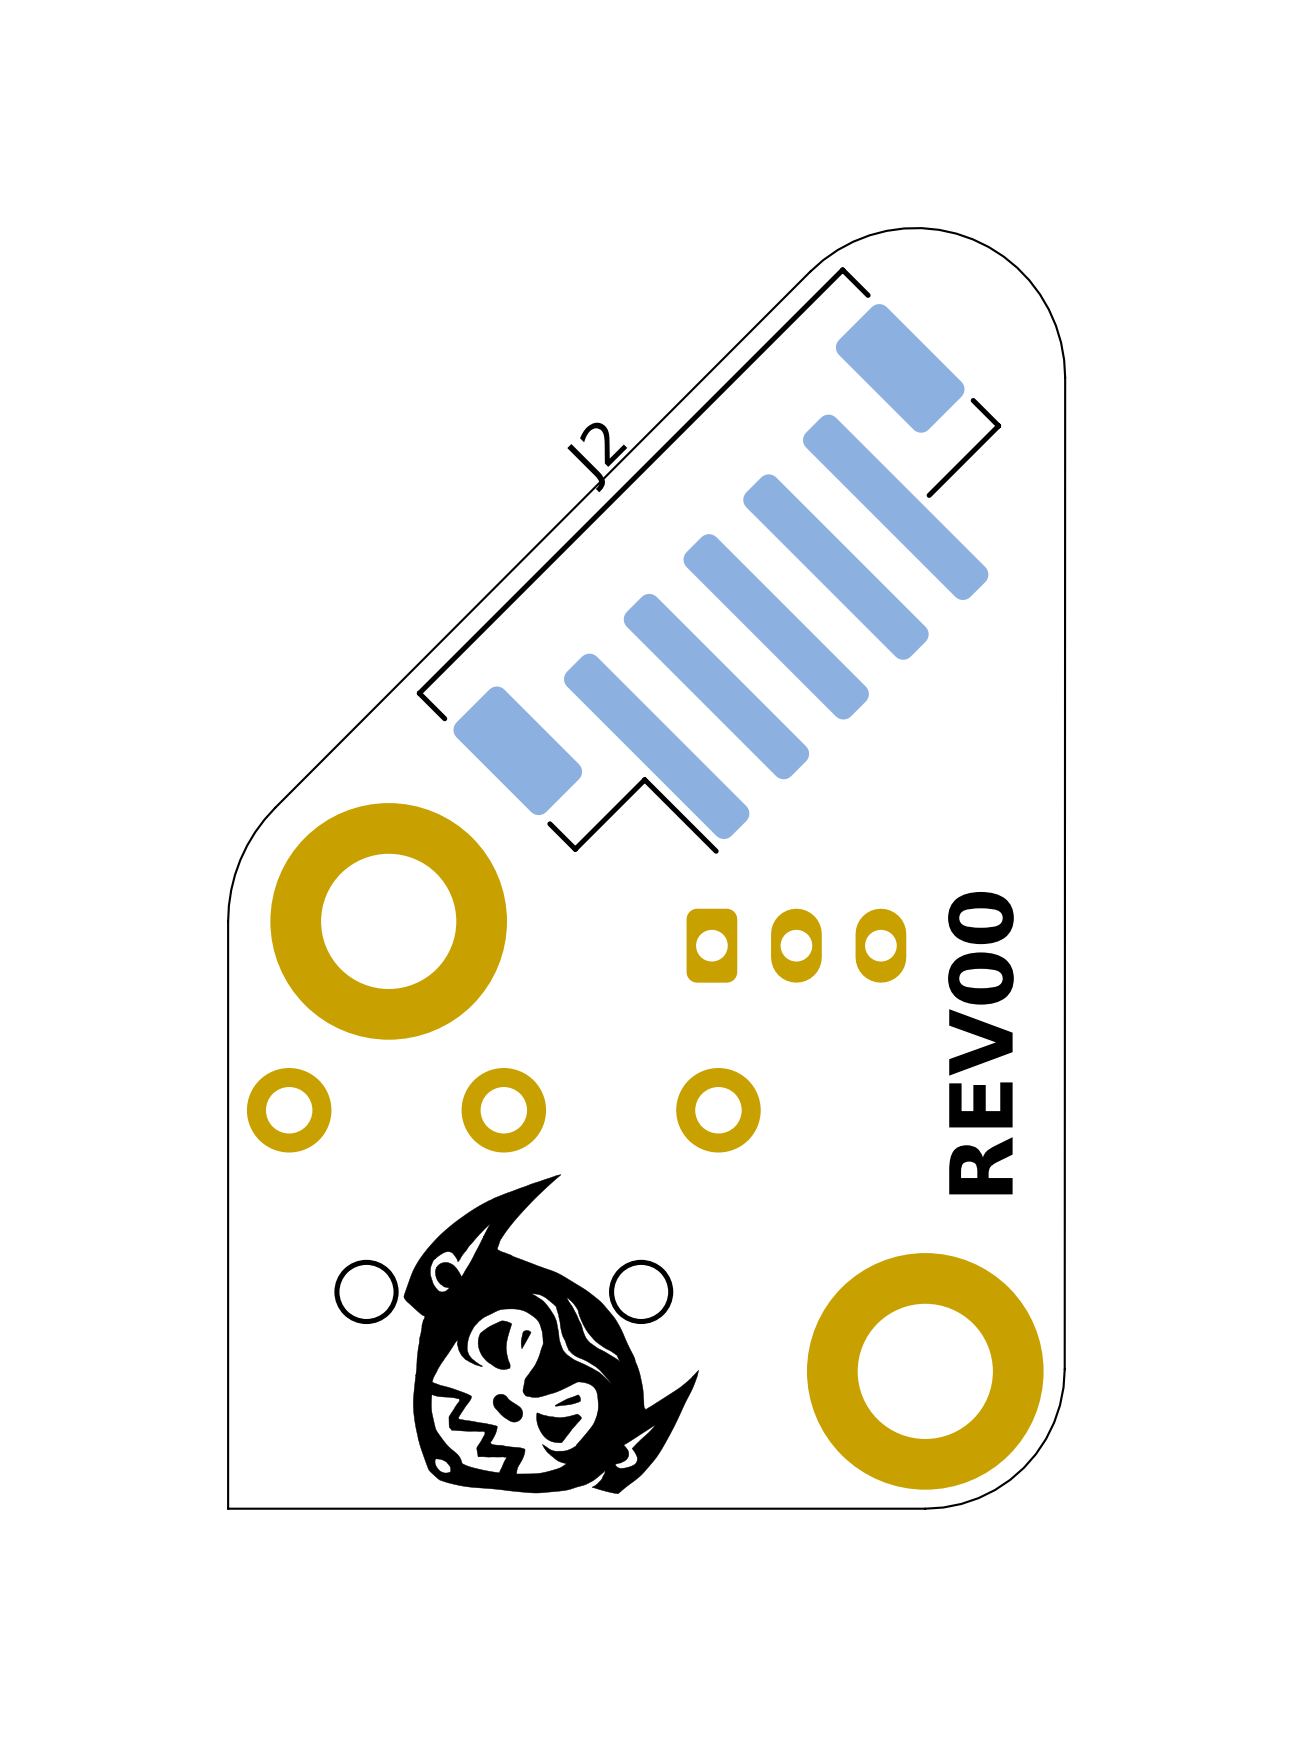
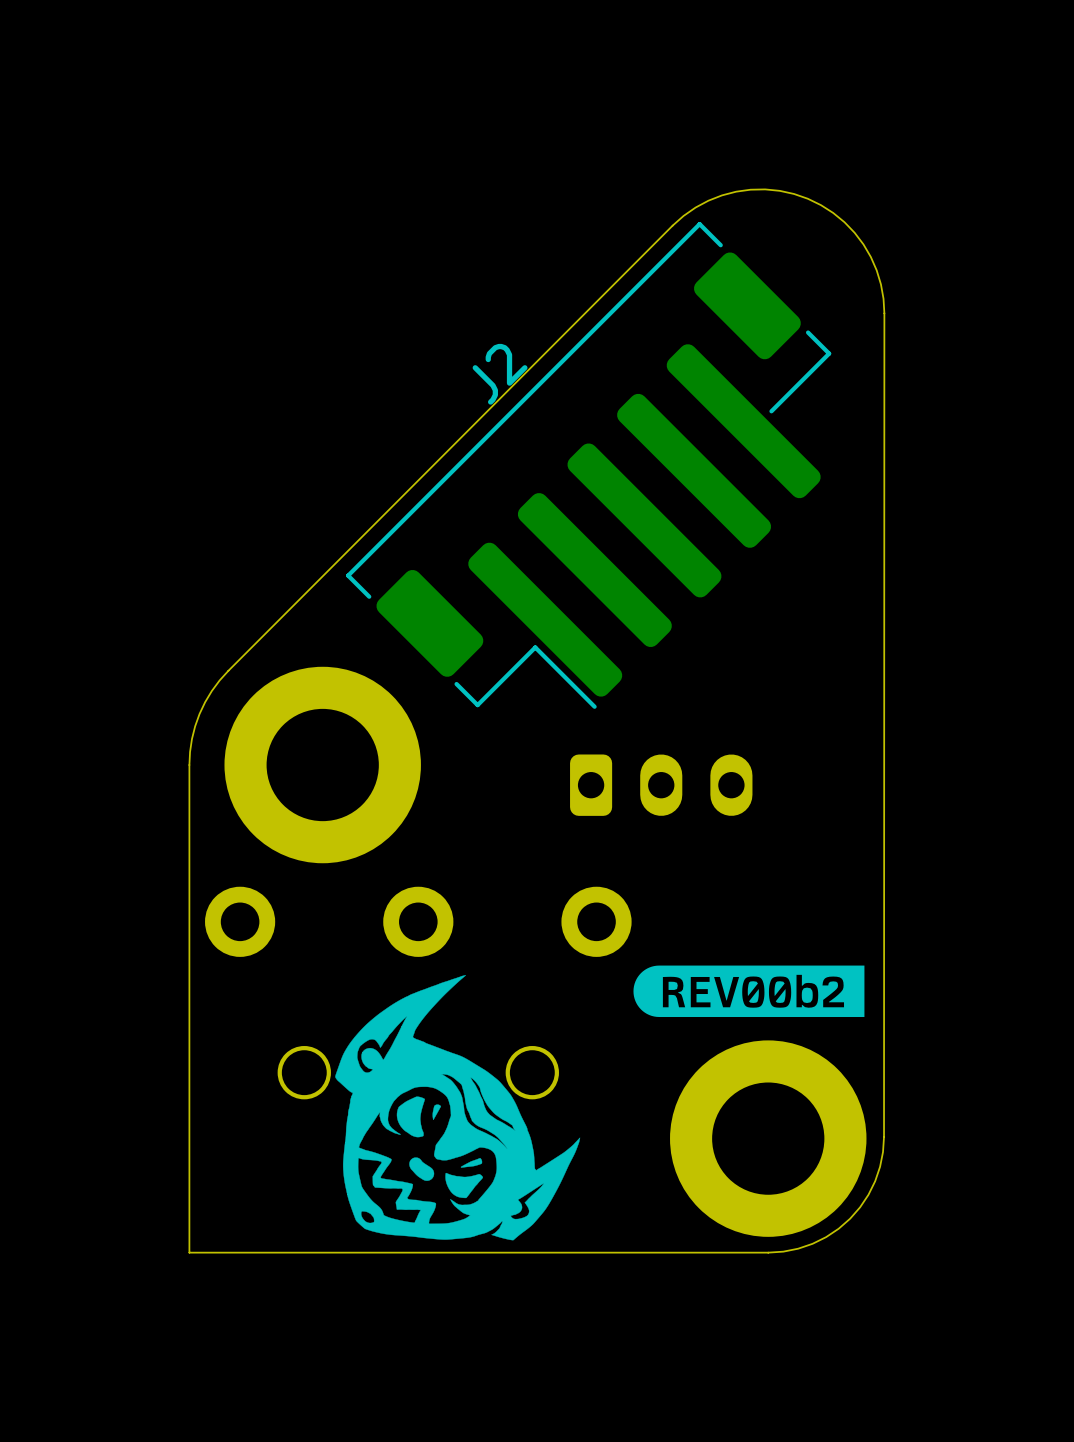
text: REV00 (980, 1043) -> none
drawing: none -> [633, 965, 865, 1018]

